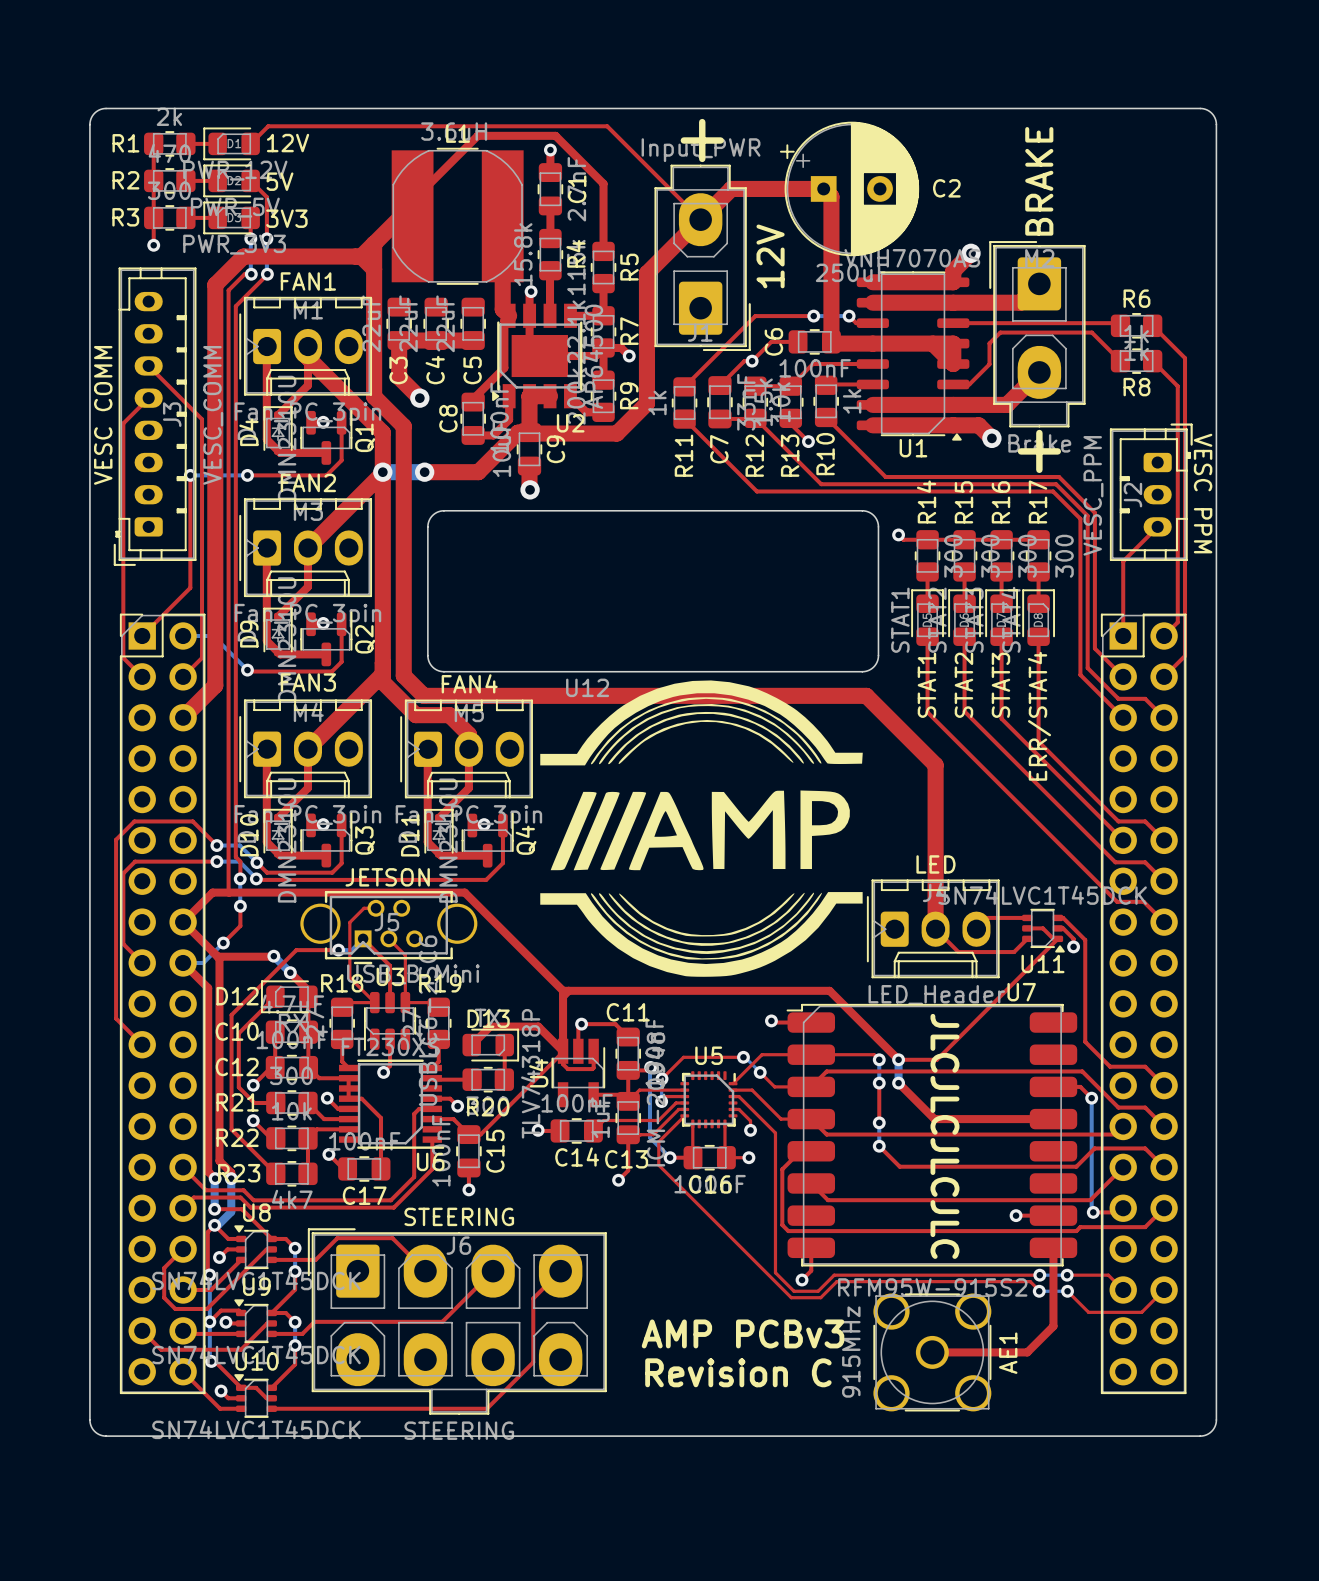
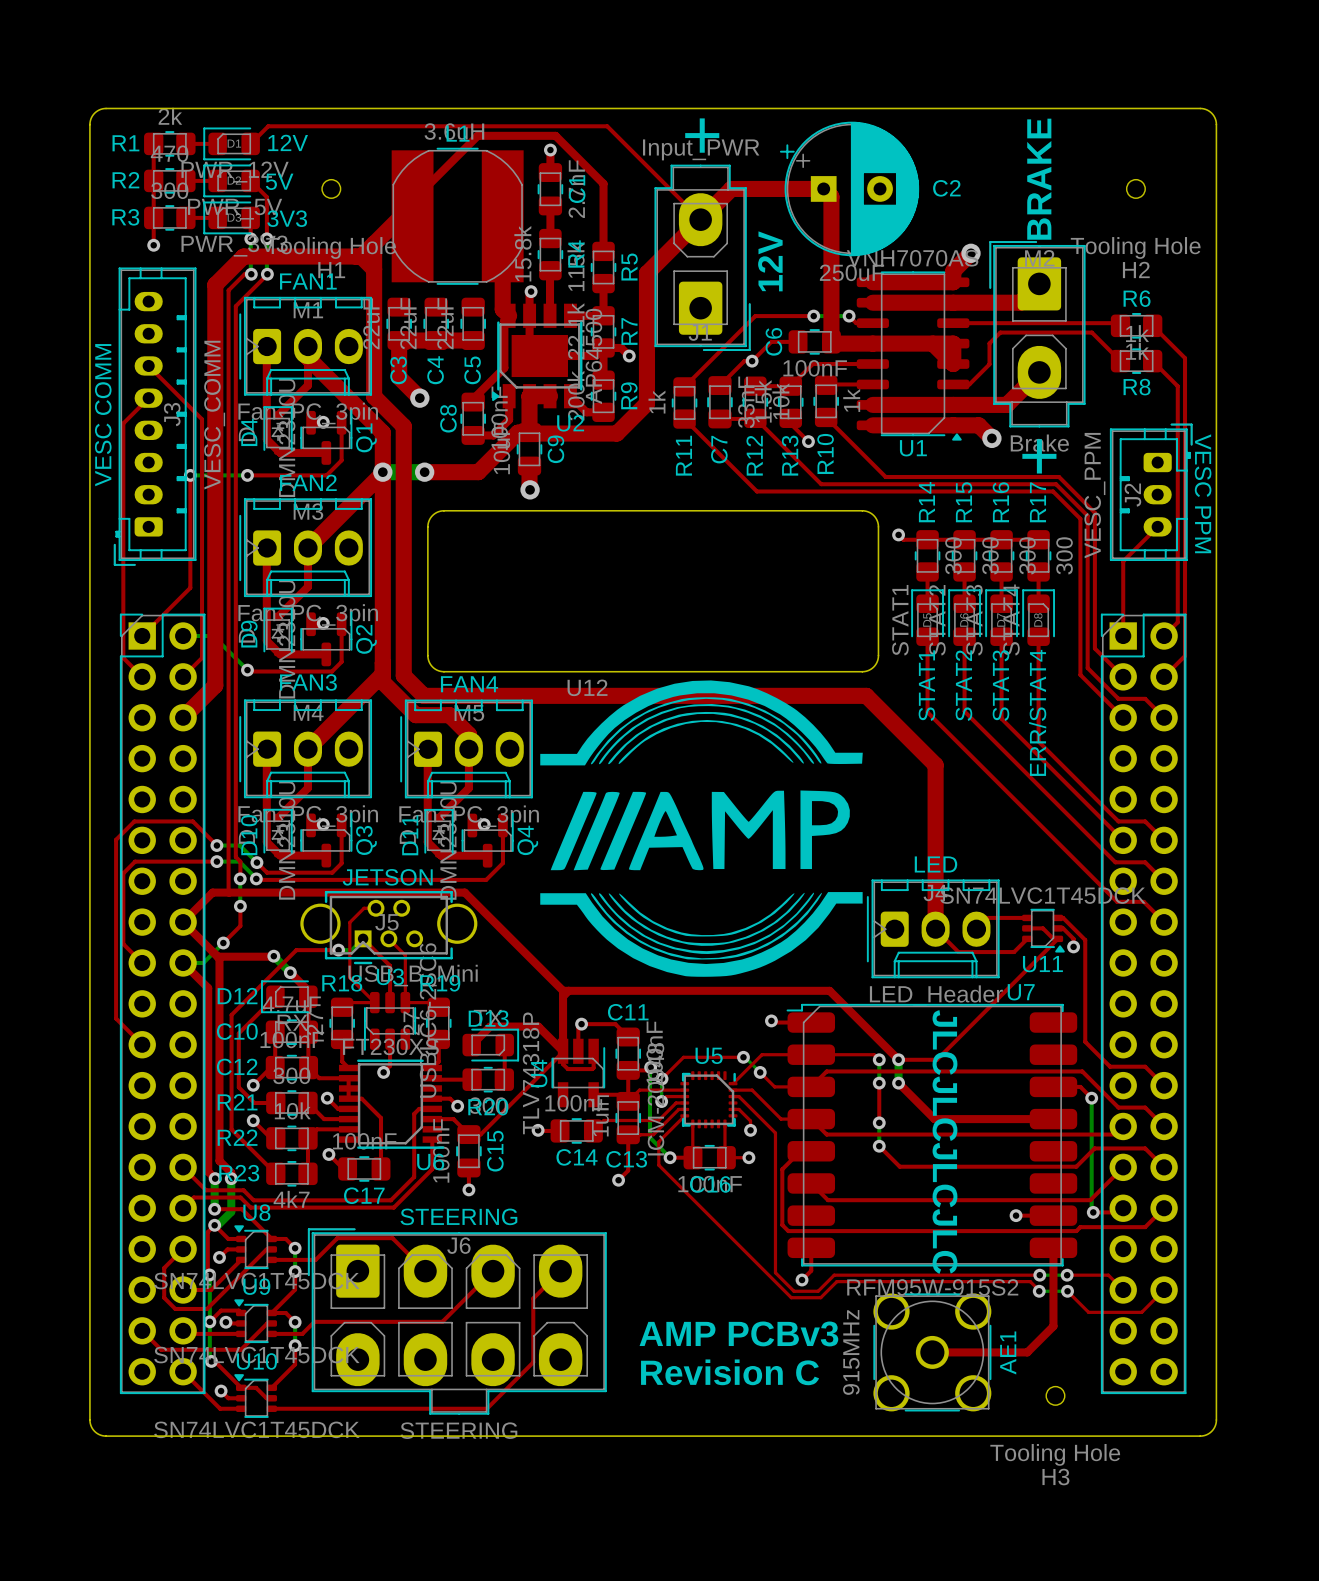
H1: none -> Tooling Hole (331, 188)
H2: none -> Tooling Hole (1135, 188)
H3: none -> Tooling Hole (1055, 1395)

